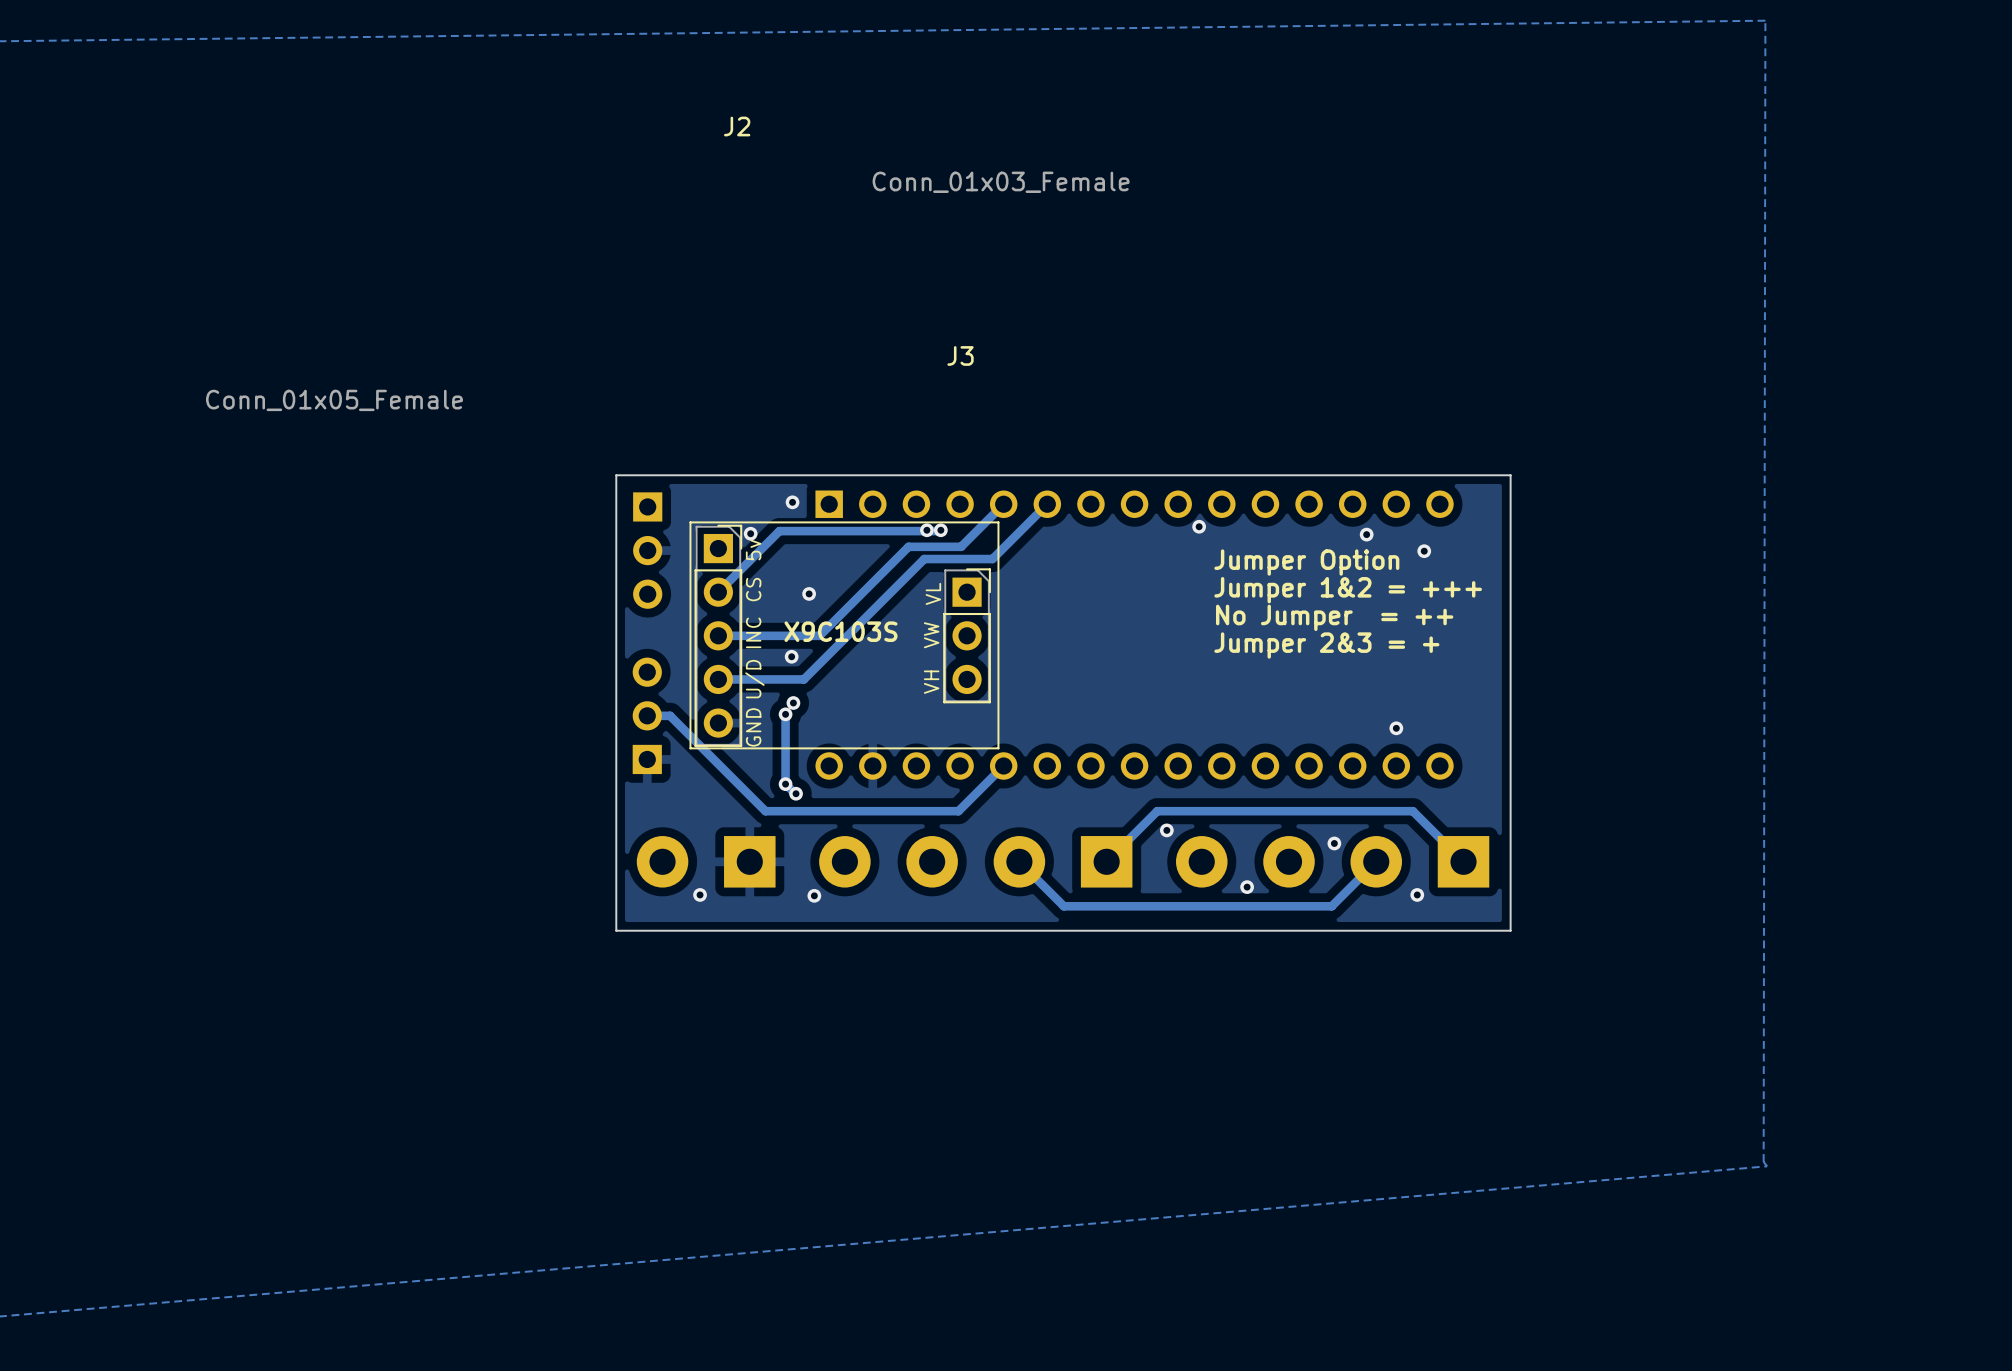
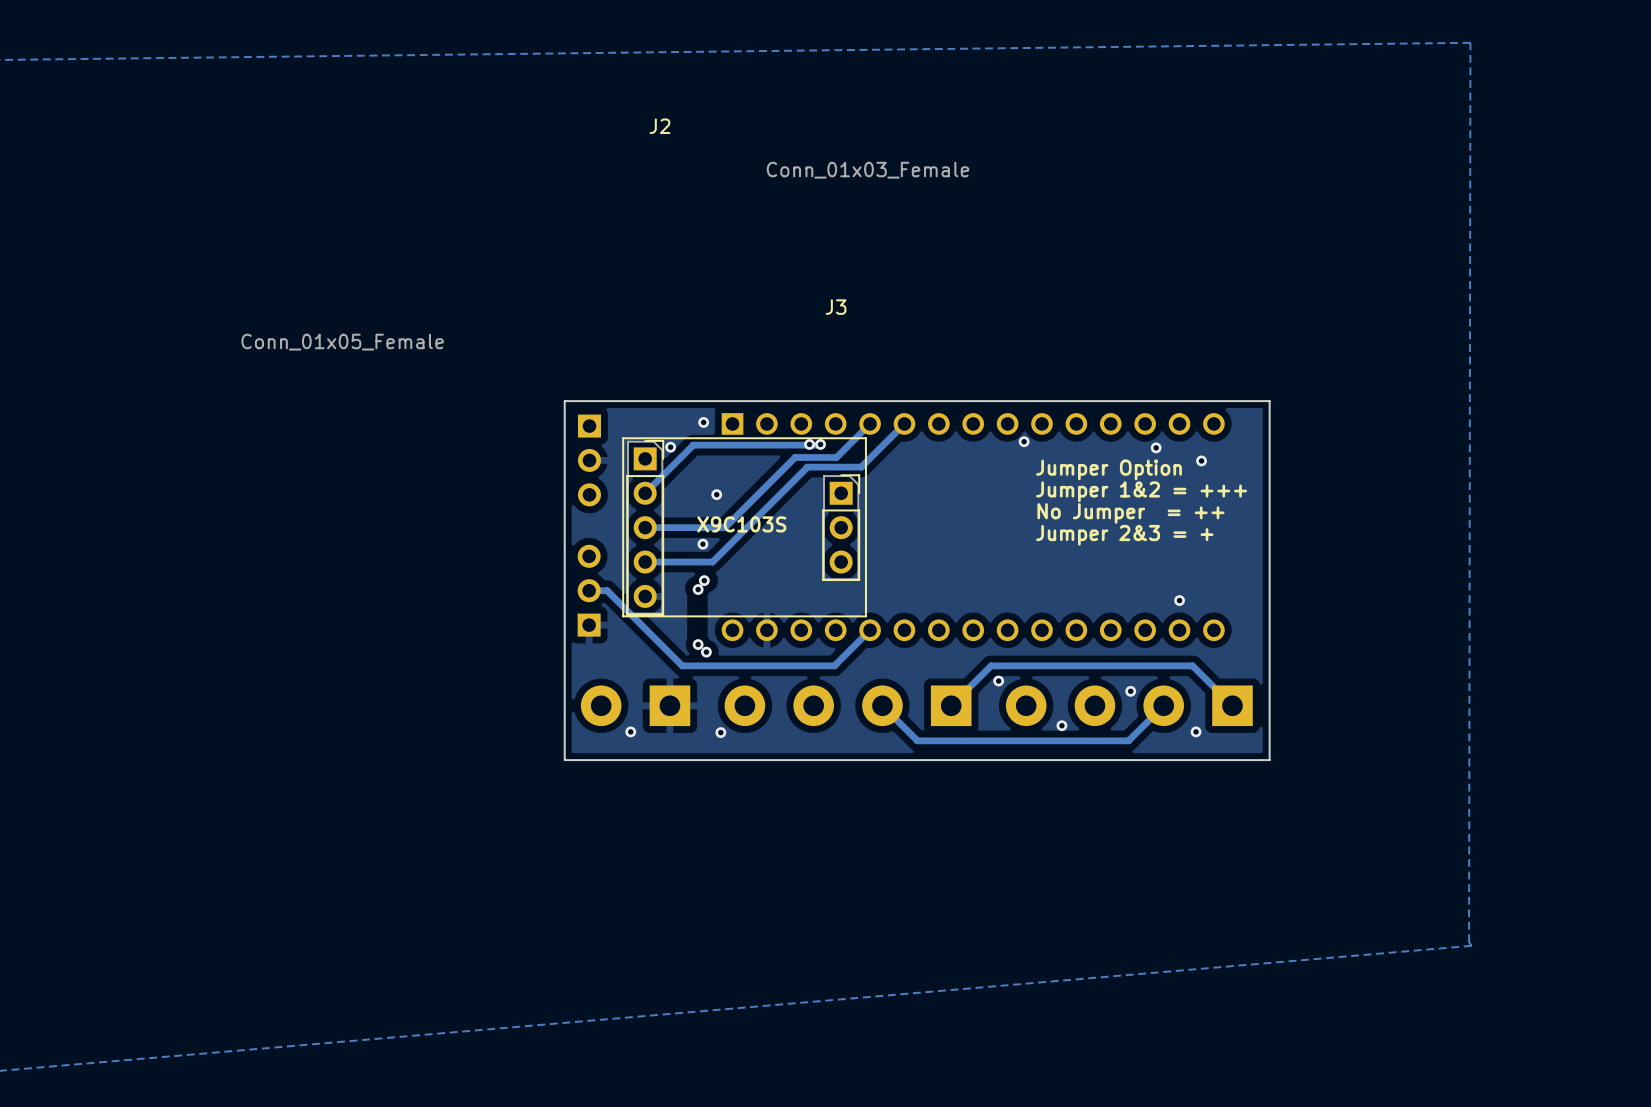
text: 5v (753, 549) -> none
text: CS (753, 589) -> none
text: VL (933, 593) -> none
text: INC (753, 632) -> none
text: VW (931, 635) -> none
text: U/D (754, 679) -> none
text: VH (931, 682) -> none
track: (785, 714) (785, 784) (796, 793) -> none
text: GND (753, 727) -> none

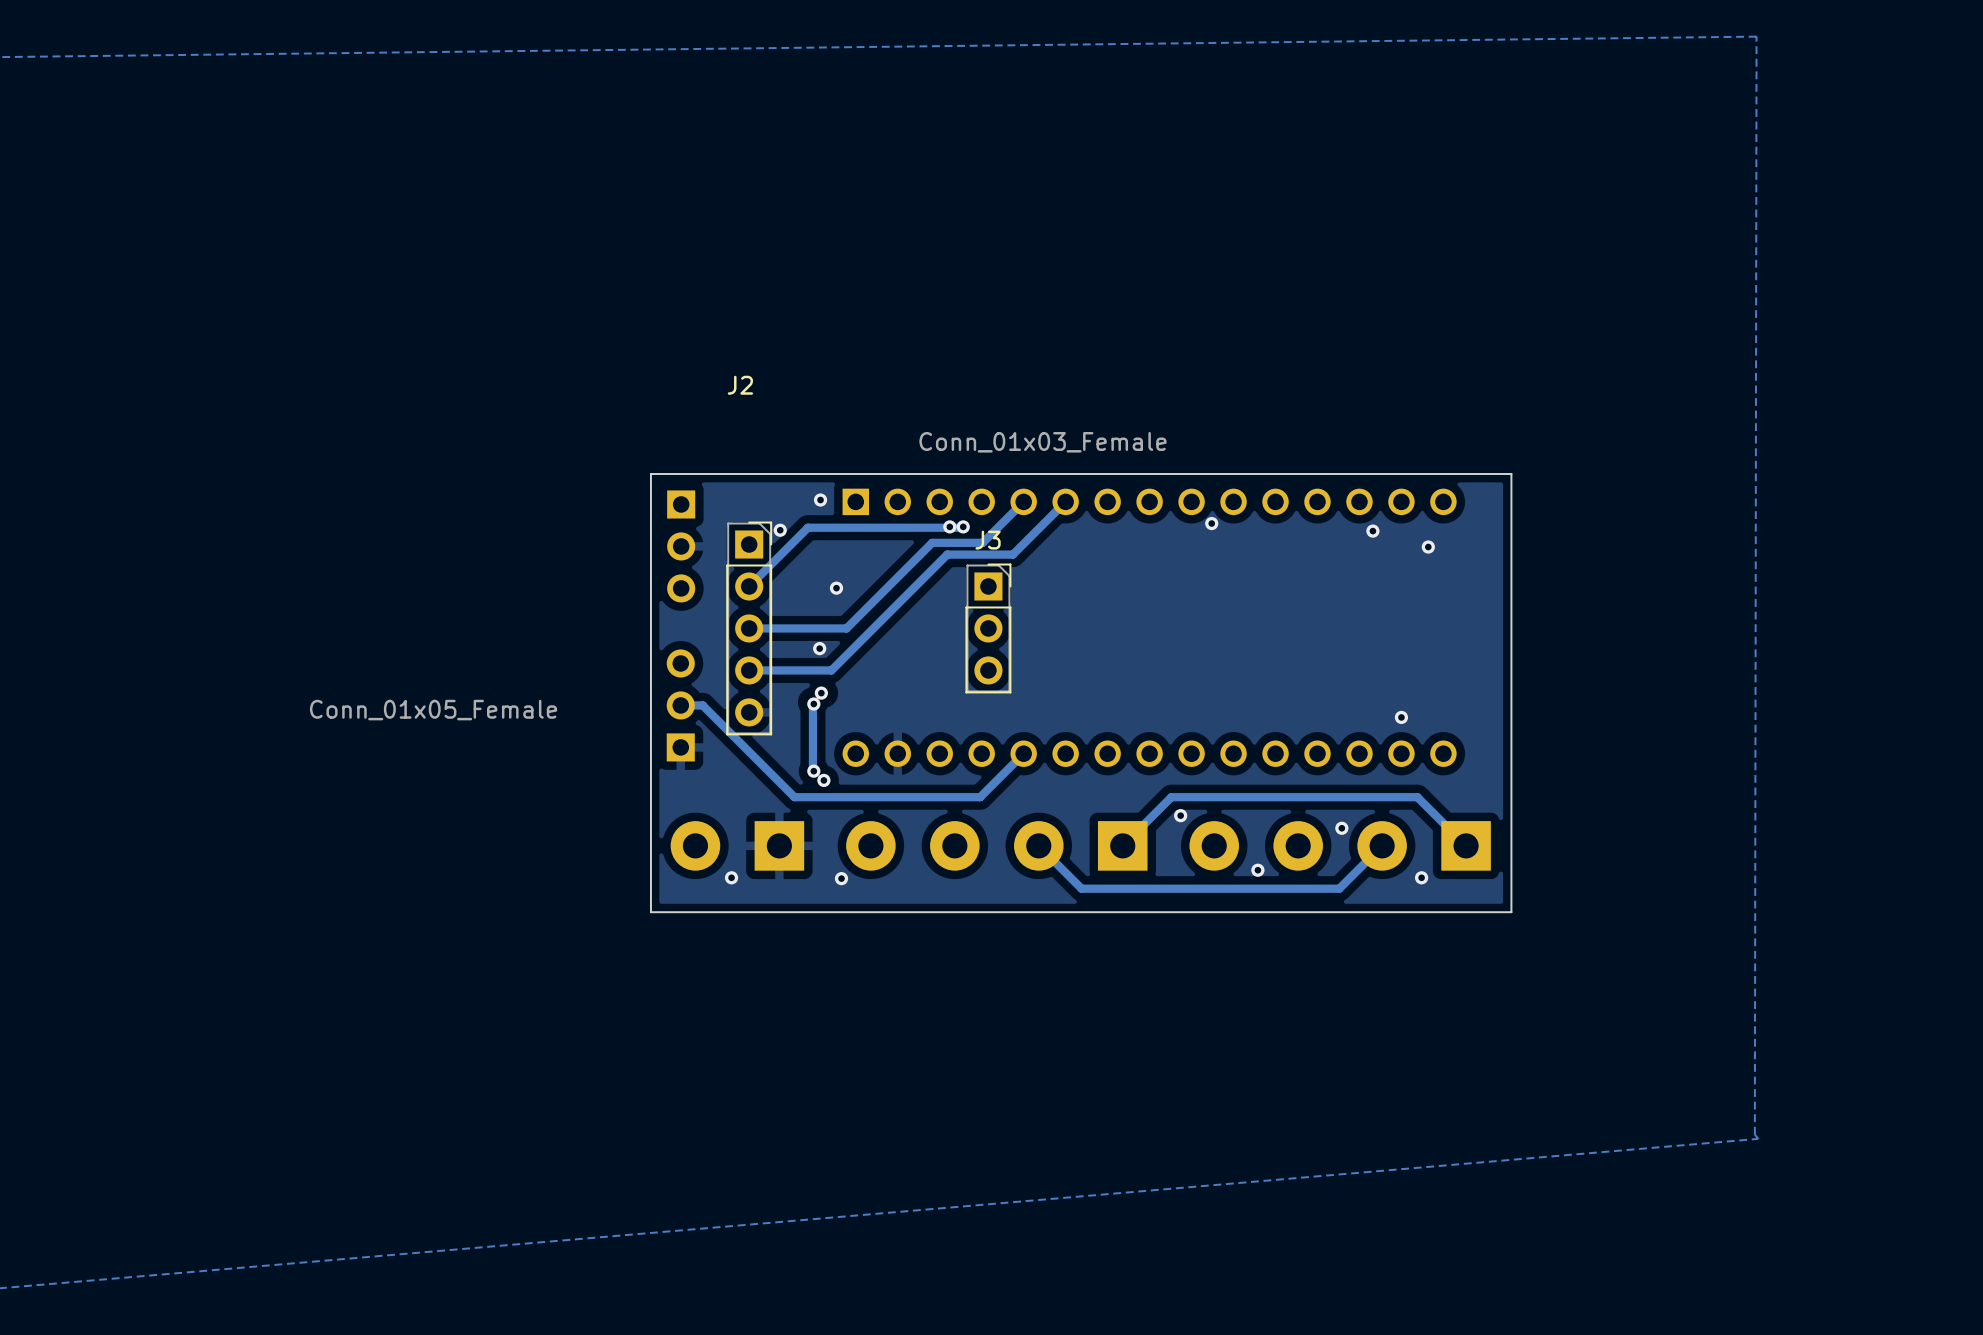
J2 name position: J2 (660, 126) -> J2 (740, 385)
J3 value position: Conn_01x03_Female (868, 170) -> Conn_01x03_Female (1042, 442)
J3 name position: J3 (836, 307) -> J3 (988, 540)
J2 value position: Conn_01x05_Female (342, 342) -> Conn_01x05_Female (433, 710)
line: (865, 438) (623, 438) (623, 616) (865, 616) (865, 438) -> none
text: Jumper Option (1109, 469) -> none
text: Jumper 1&2 = +++ (1141, 491) -> none
text: No Jumper = ++ (1130, 513) -> none
text: X9C103S (741, 524) -> none
text: Jumper 2&3 = + (1124, 535) -> none
track: none -> (812, 703) (812, 770)

